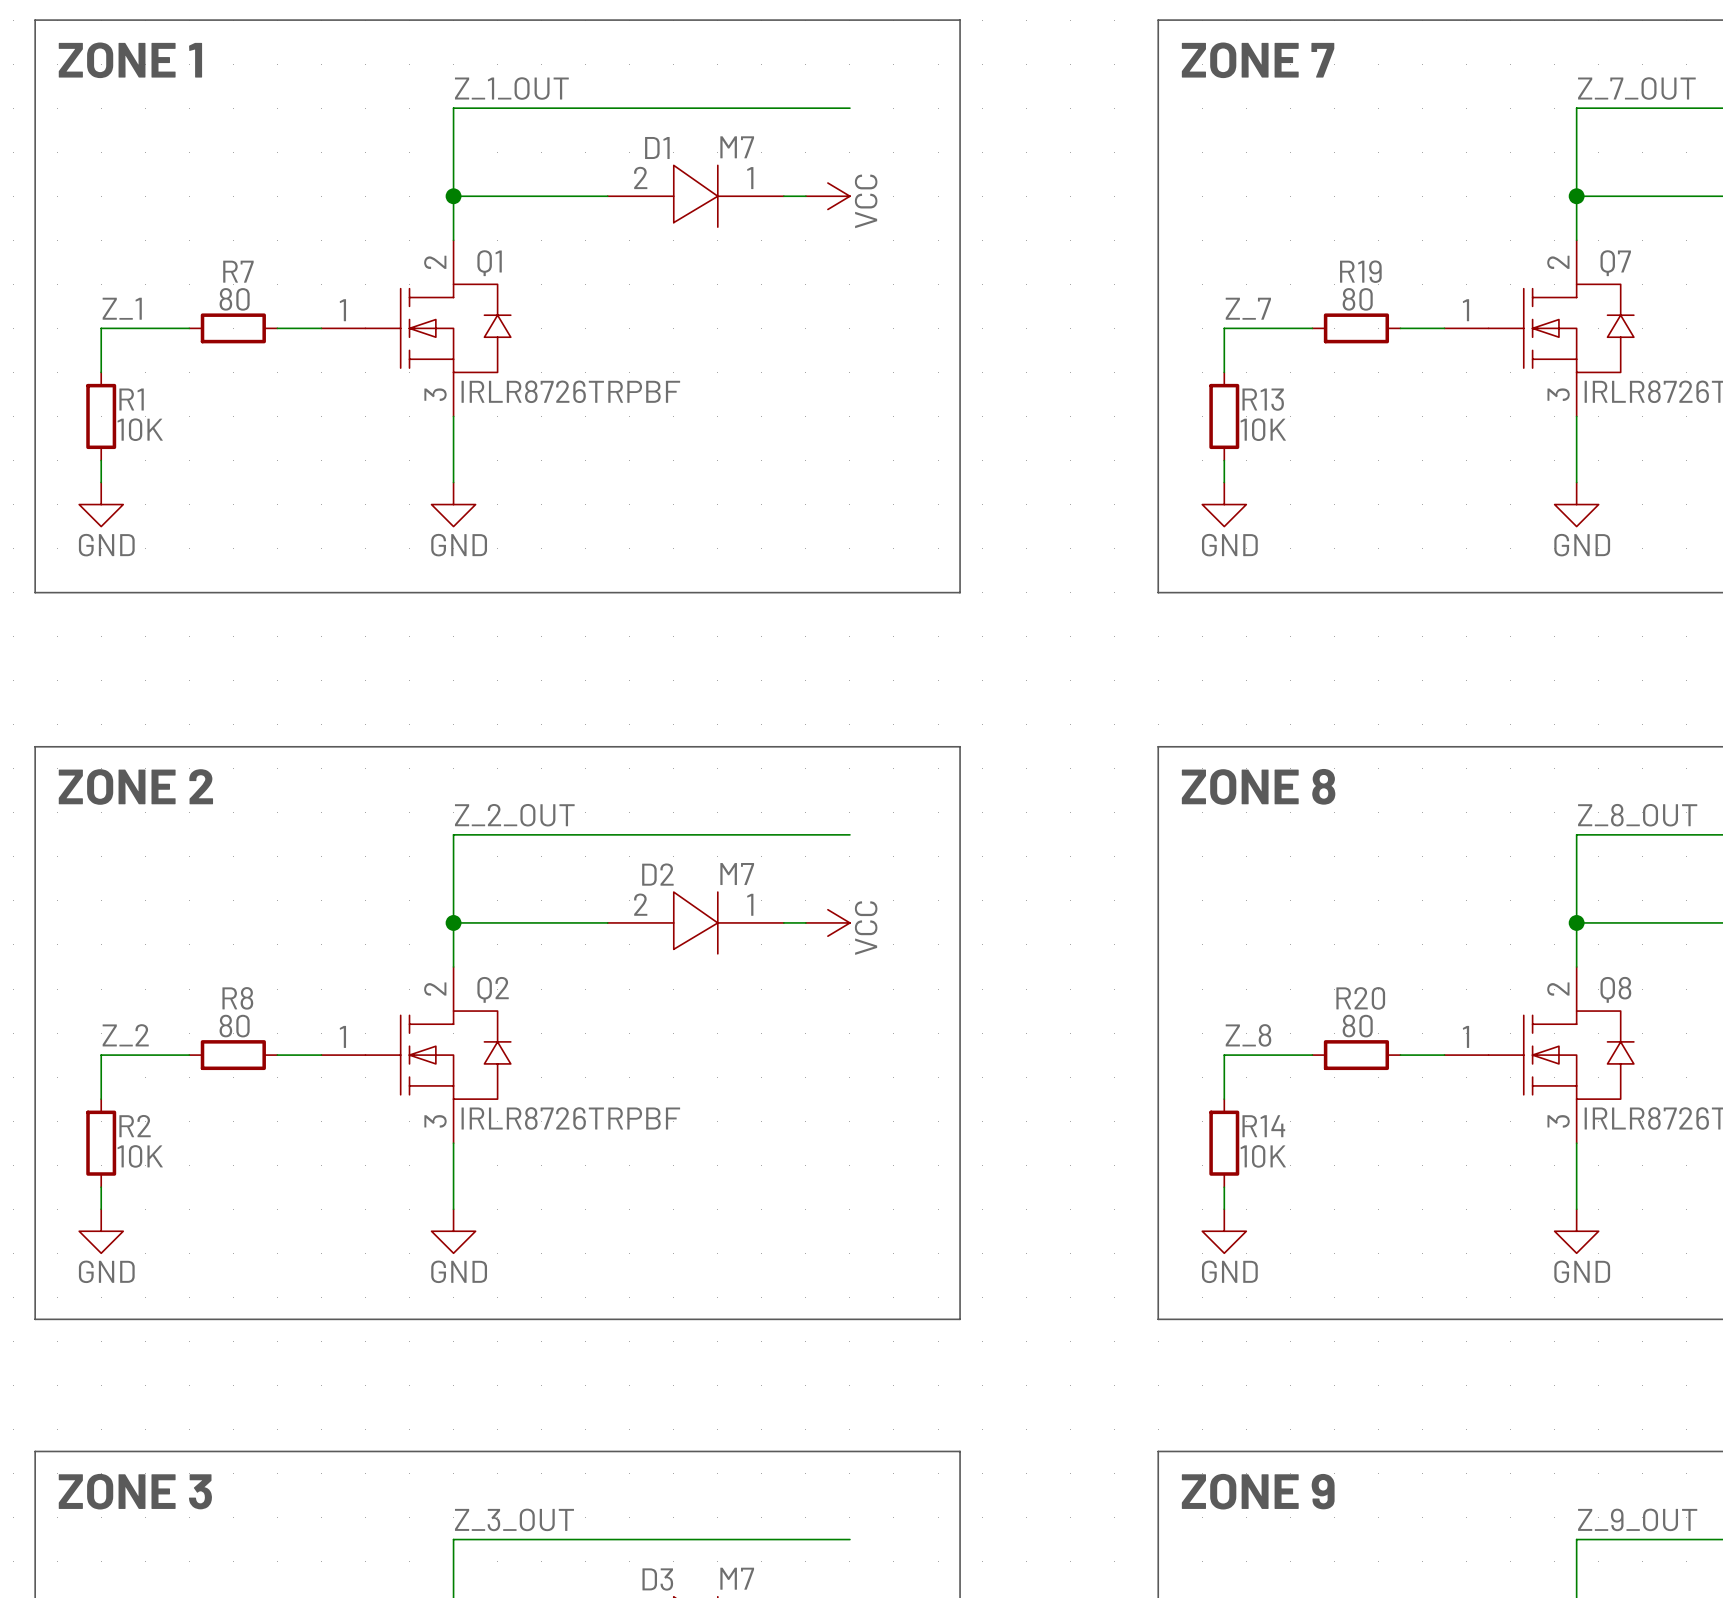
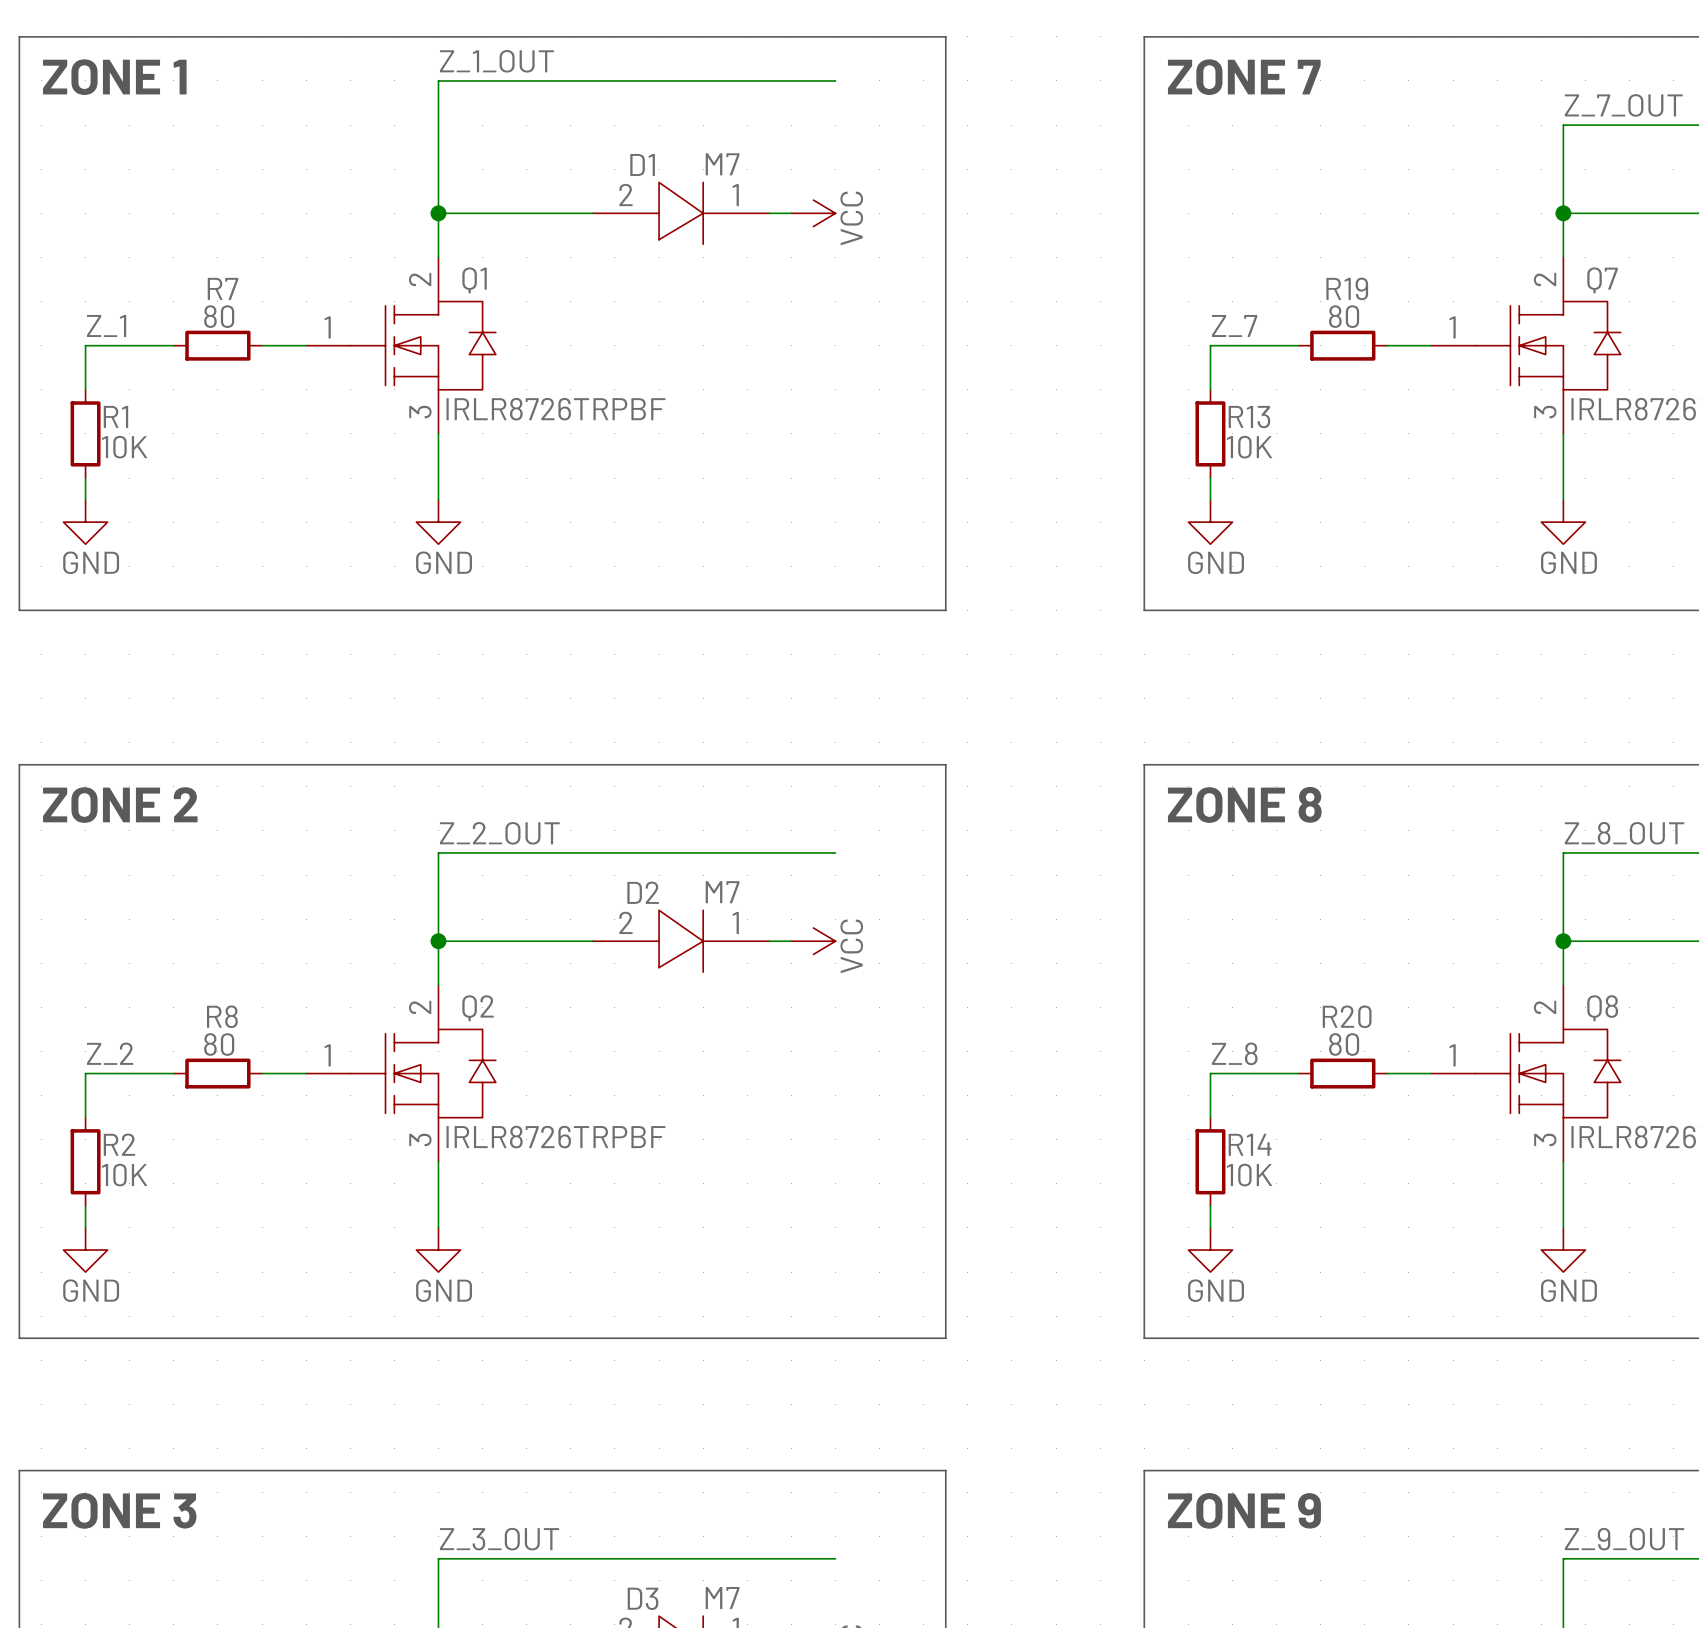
label position: Z_1_OUT (511, 88) -> Z_1_OUT (496, 61)
wire: (453, 108) (849, 108) -> (438, 125) (438, 80) (835, 80)

